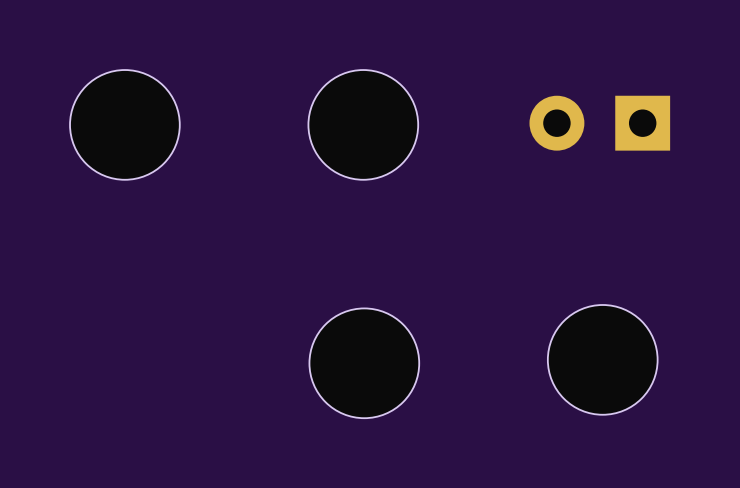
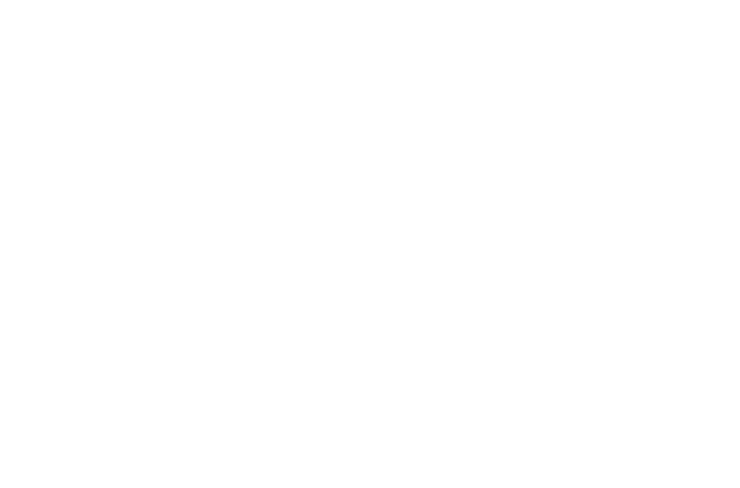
part: (599, 123) -> none
part: (124, 124) -> none
part: (363, 124) -> none
part: (602, 359) -> none
part: (364, 363) -> none

